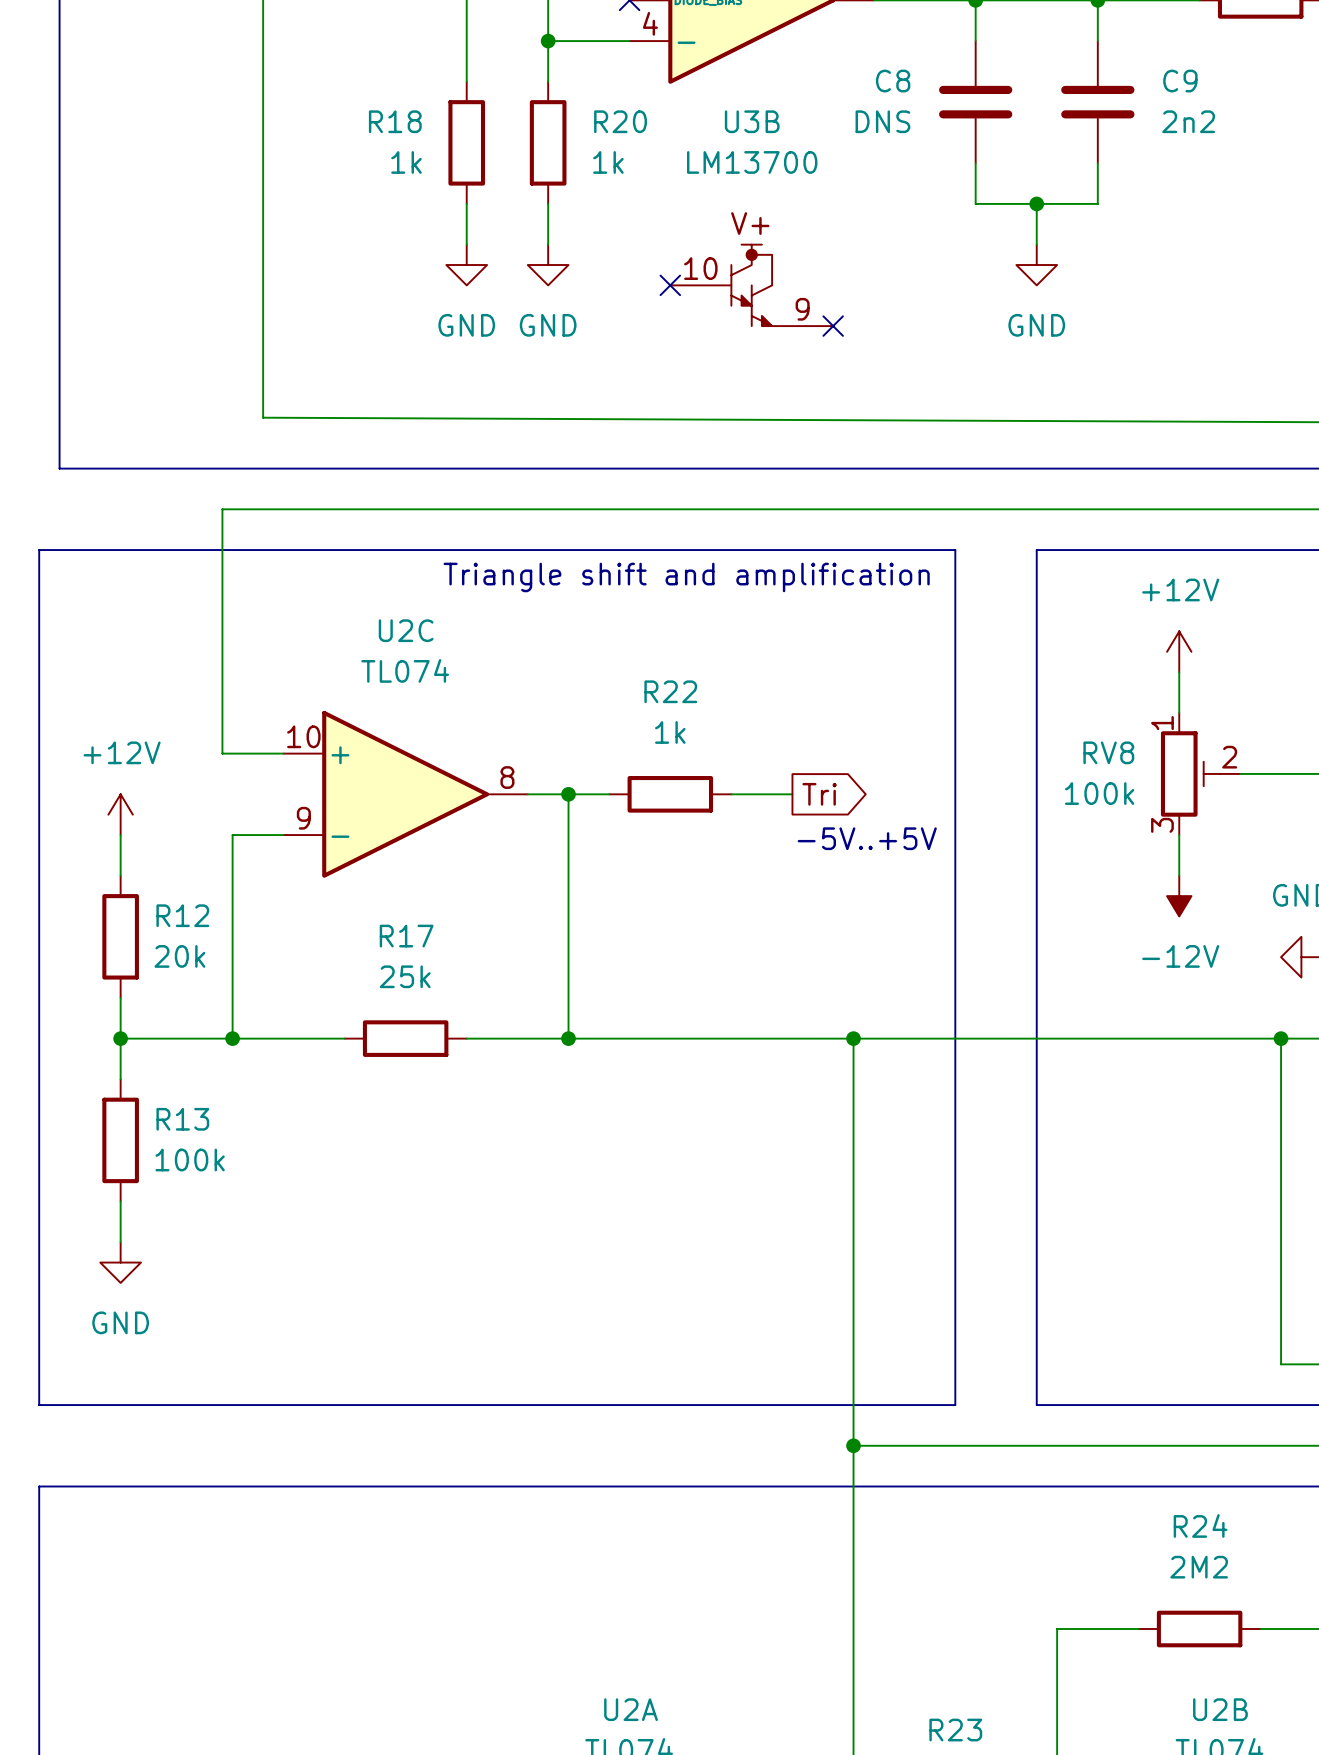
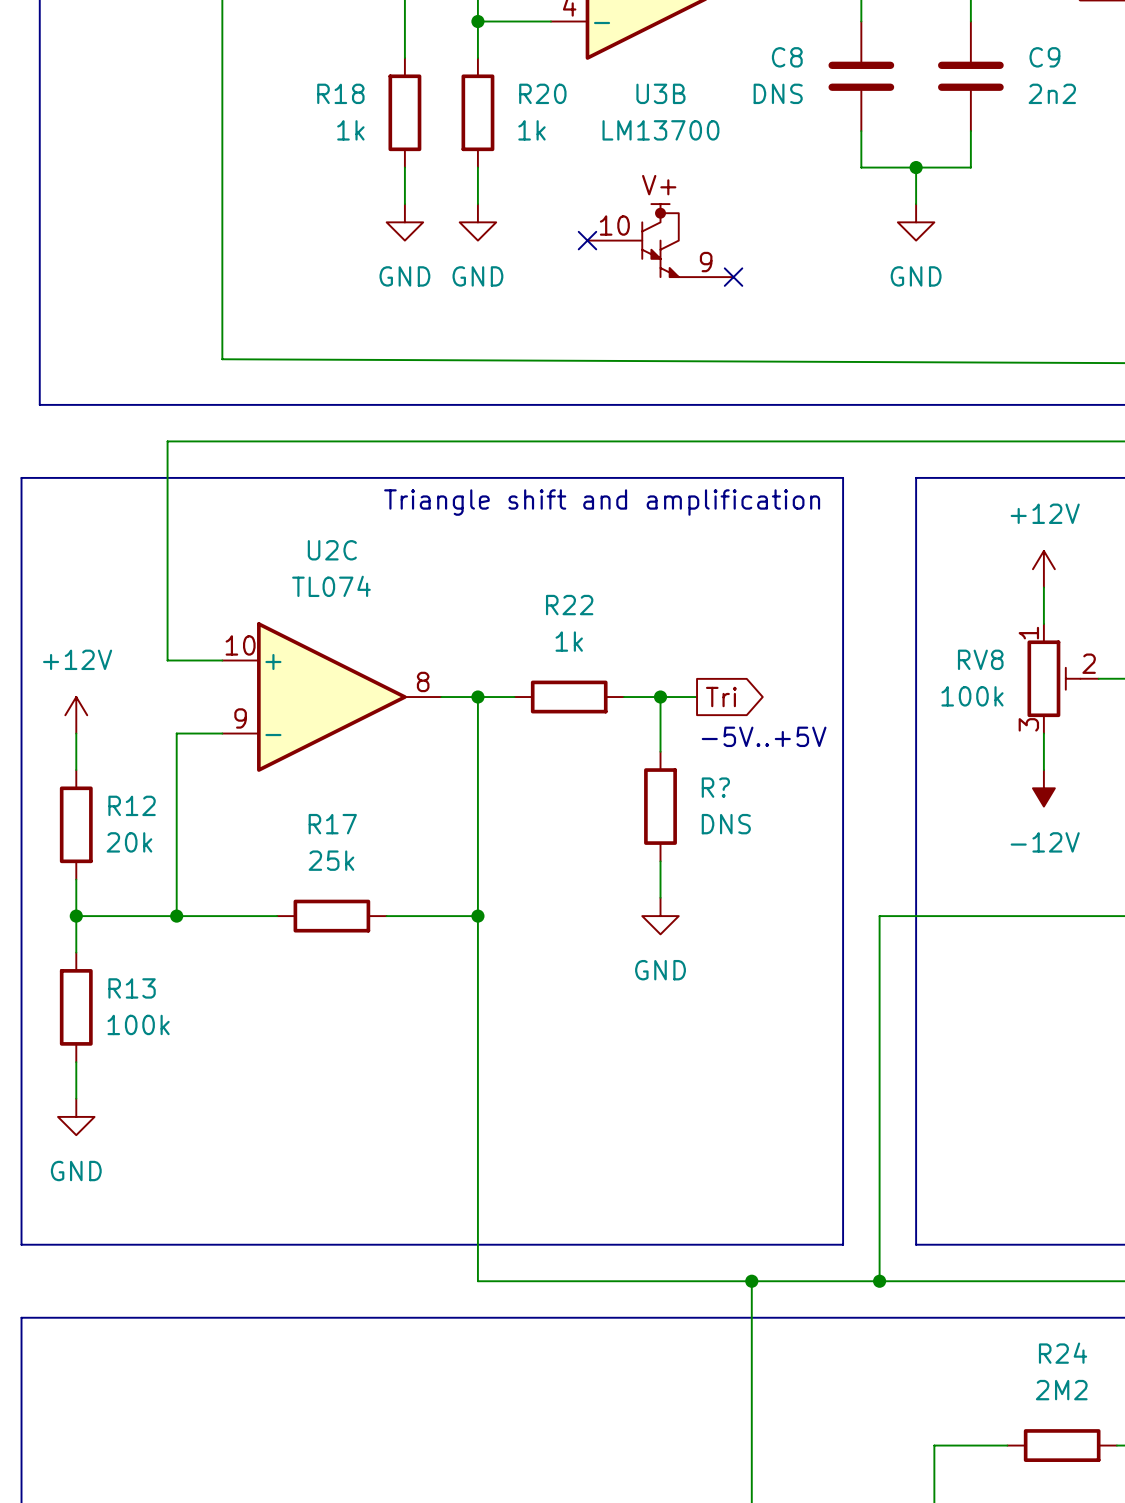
wire: (222, 509) (222, 753) -> (185, 441) (167, 441) (167, 660) (185, 660)
U2C position: (405, 794) -> (331, 697)
wire: (568, 794) (568, 1038) -> none
junction position: (568, 794) -> (477, 697)
R22 position: (670, 794) -> (569, 697)
wire: none -> (660, 697) (660, 751)
junction: none -> (660, 697)
power symbol position: +12V (120, 814) -> +12V (76, 715)
wire: (120, 835) (120, 875) -> (76, 733) (76, 770)
wire: (232, 835) (232, 1038) -> (194, 733) (176, 733) (176, 916)
R?: none -> DNS (660, 806)
R12 position: (120, 936) -> (76, 824)
wire: none -> (660, 861) (660, 897)
wire: (120, 997) (120, 1079) -> (76, 879) (76, 952)
junction position: (120, 1038) -> (76, 916)
junction position: (232, 1038) -> (176, 916)
R17 position: (405, 1038) -> (331, 916)
wire: (548, 1038) (996, 1038) -> (879, 1281) (879, 916)
junction position: (568, 1038) -> (477, 916)
power symbol: none -> GND (660, 916)
wire: (853, 1038) (853, 1445) -> (477, 697) (477, 1281) (751, 1281)
junction: (853, 1038) -> none
R13 position: (120, 1140) -> (76, 1007)
wire: (120, 1201) (120, 1242) -> (76, 1062) (76, 1098)
power symbol position: GND (120, 1262) -> GND (76, 1116)
junction: none -> (879, 1281)

